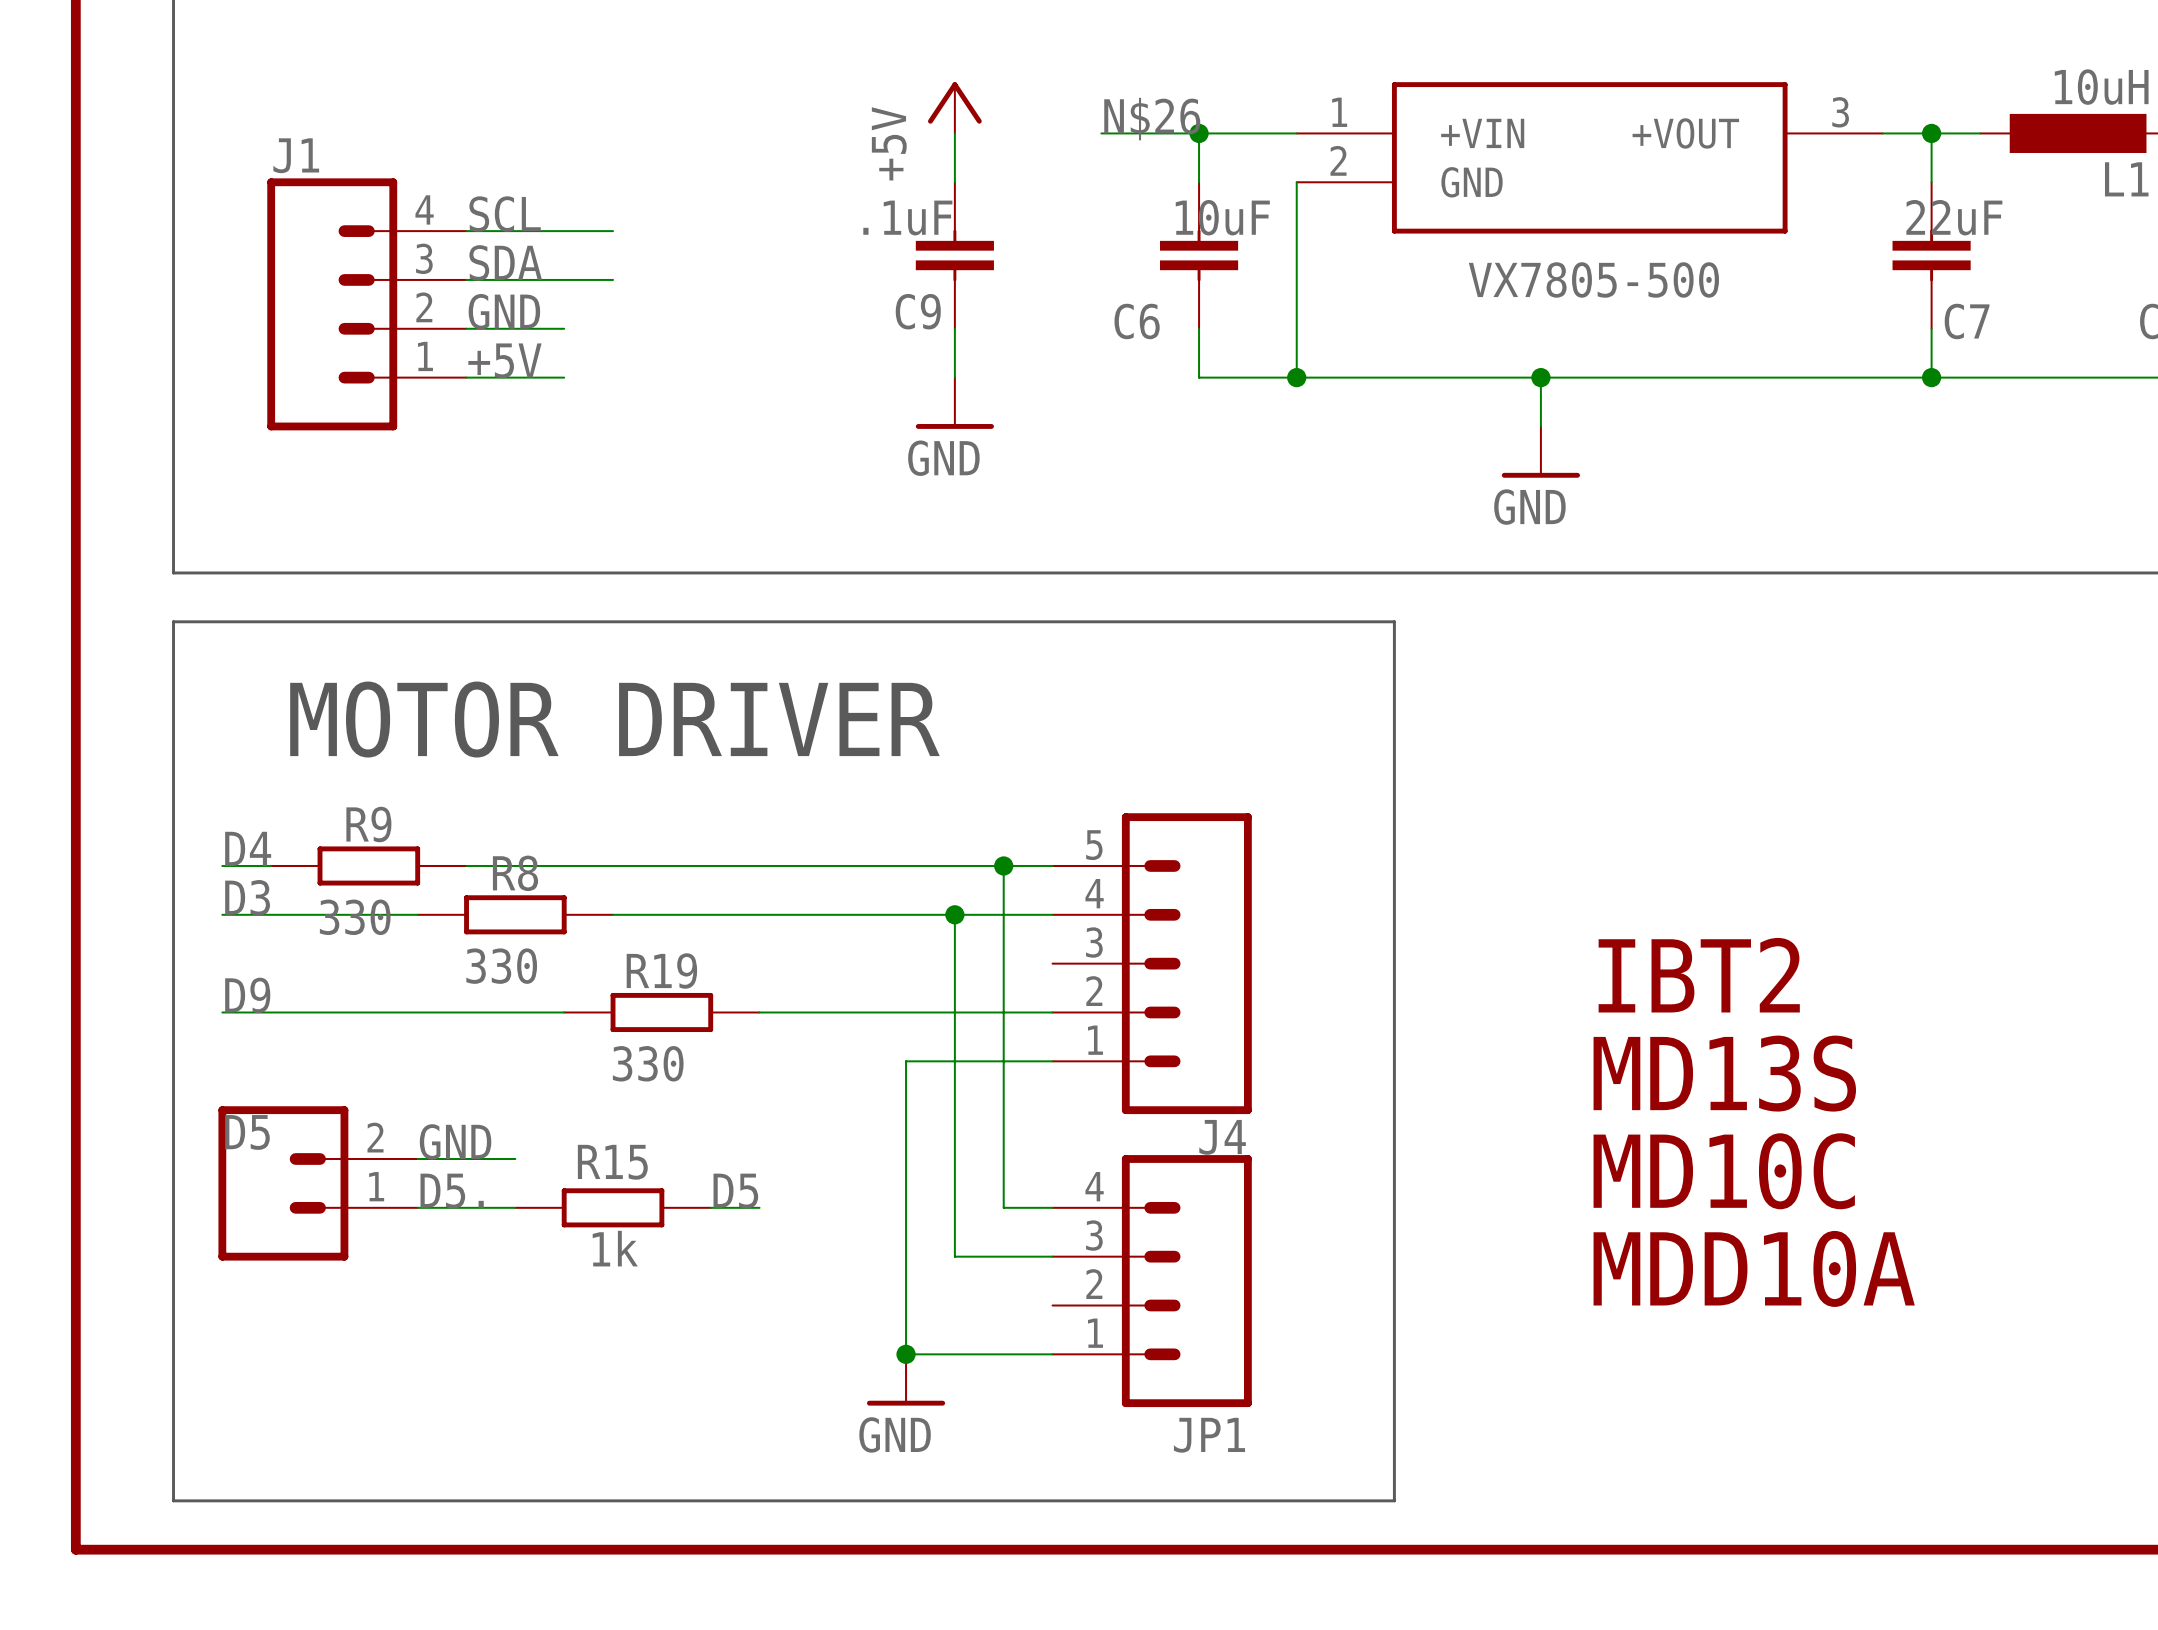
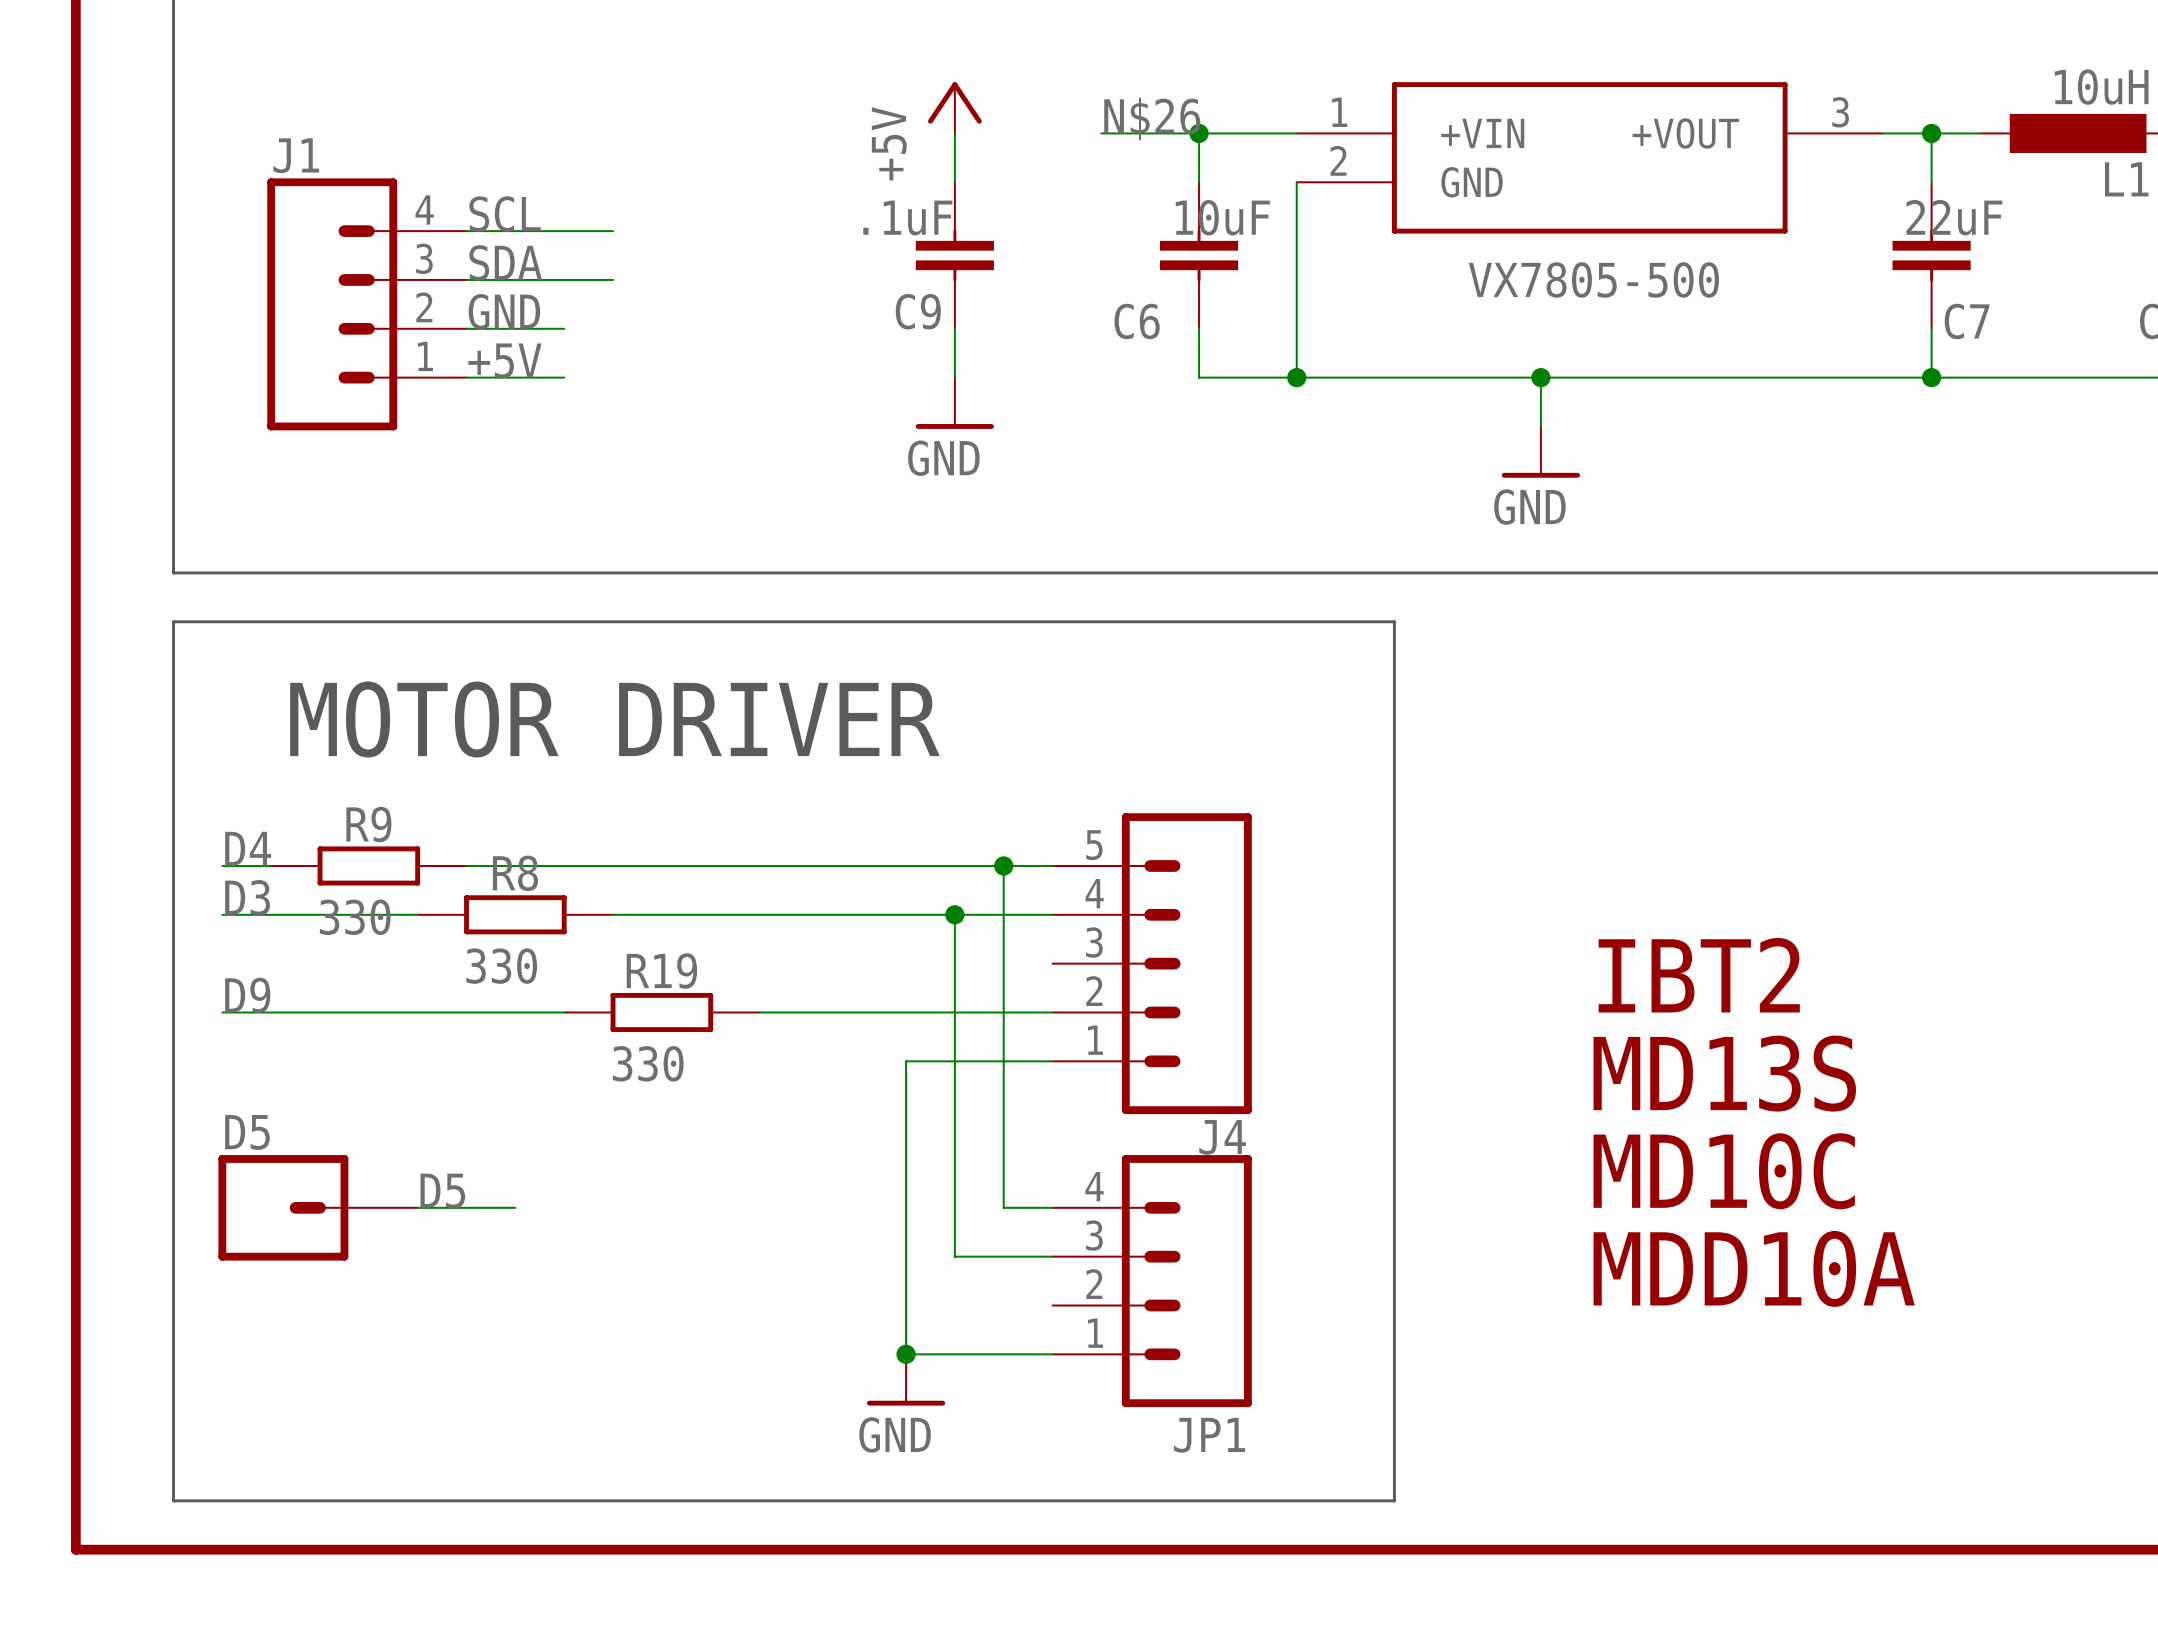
D5 symbol: [218, 1106, 418, 1261] -> [218, 1155, 418, 1261]
label: GND (455, 1141) -> none
wire: (417, 1158) (515, 1158) -> none
label: D5. (452, 1191) -> D5 (442, 1191)
label: D5 (735, 1191) -> none
R15: 1k (613, 1207) -> none
wire: (710, 1207) (759, 1207) -> none

